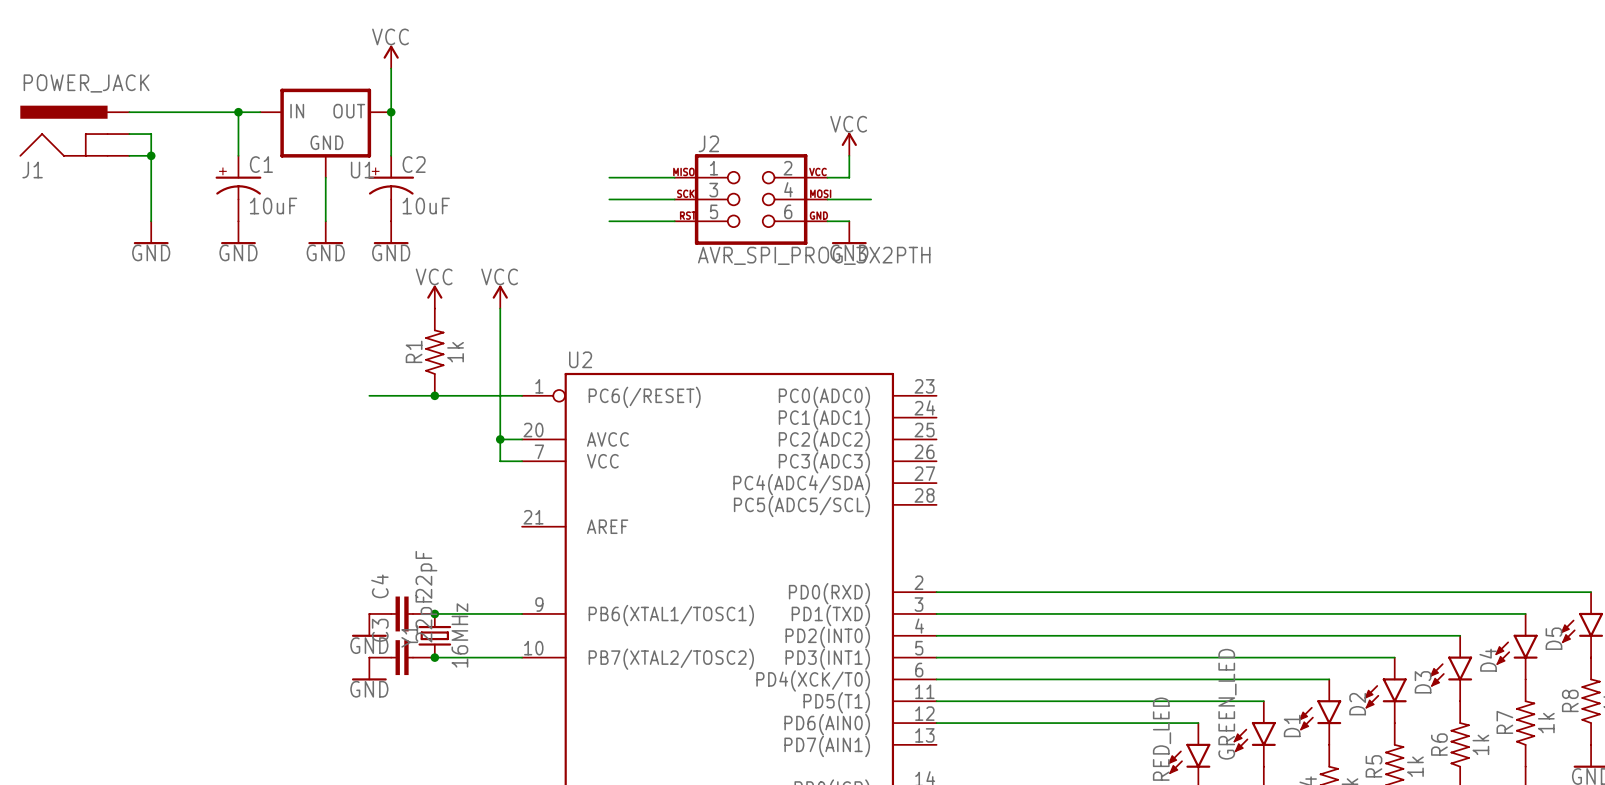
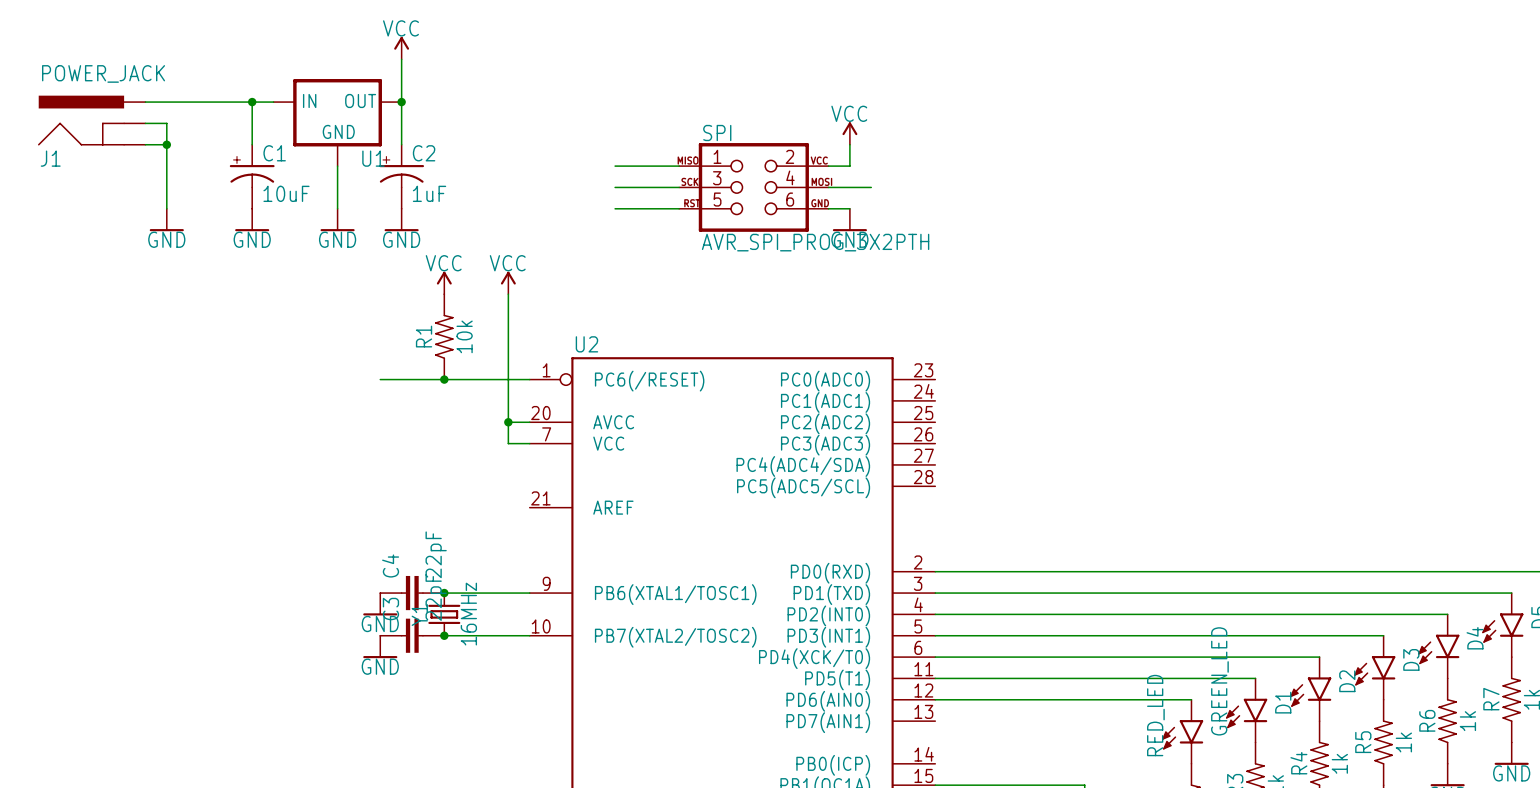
J2 name: J2 (708, 143) -> SPI (717, 133)
C2 value: 10uF (426, 206) -> 1uF (429, 193)
R1 value: 1k (455, 352) -> 10k (464, 336)

